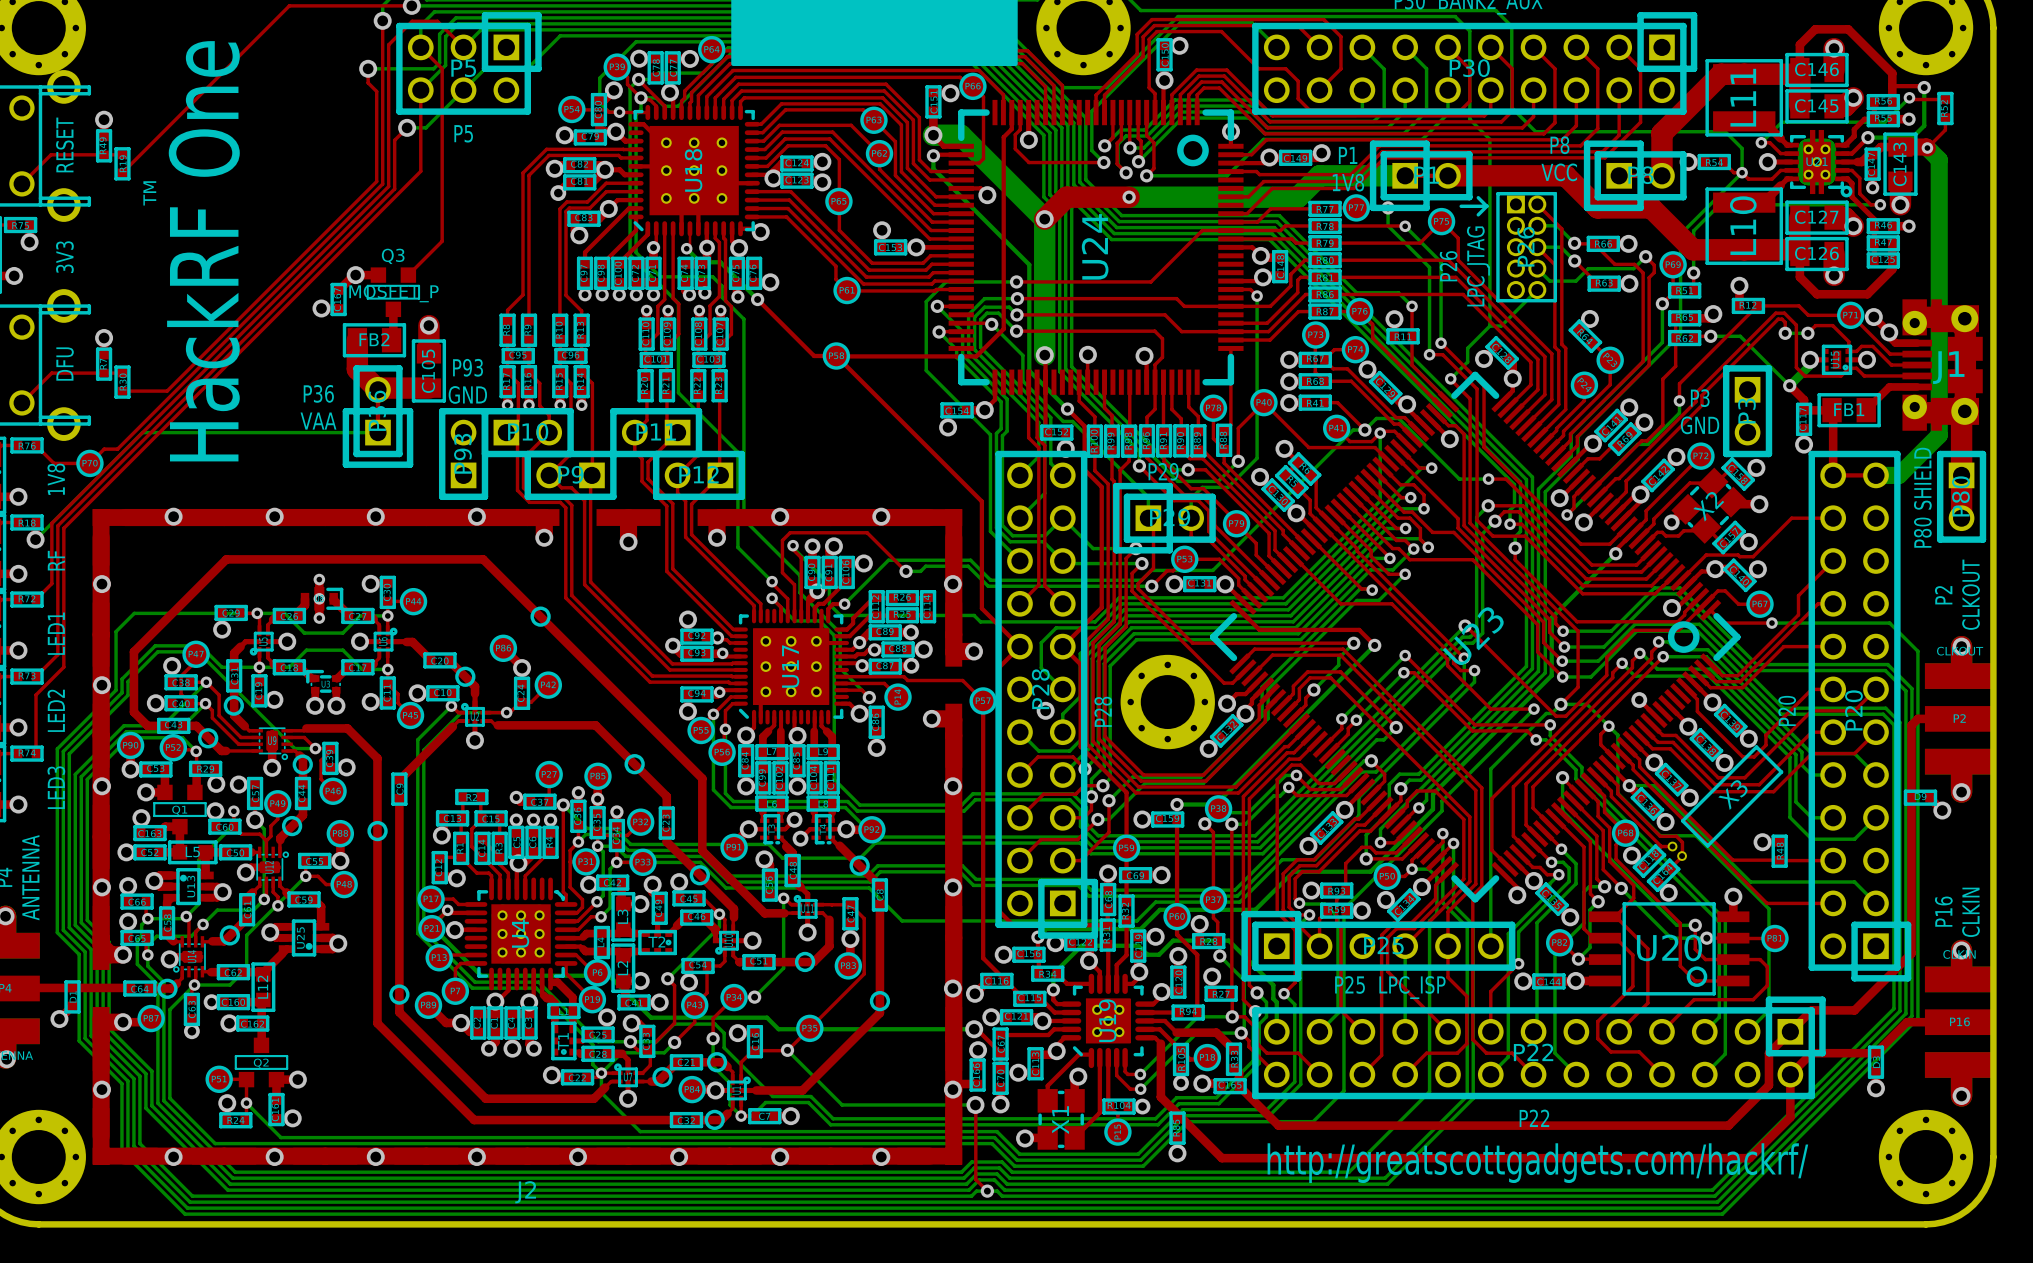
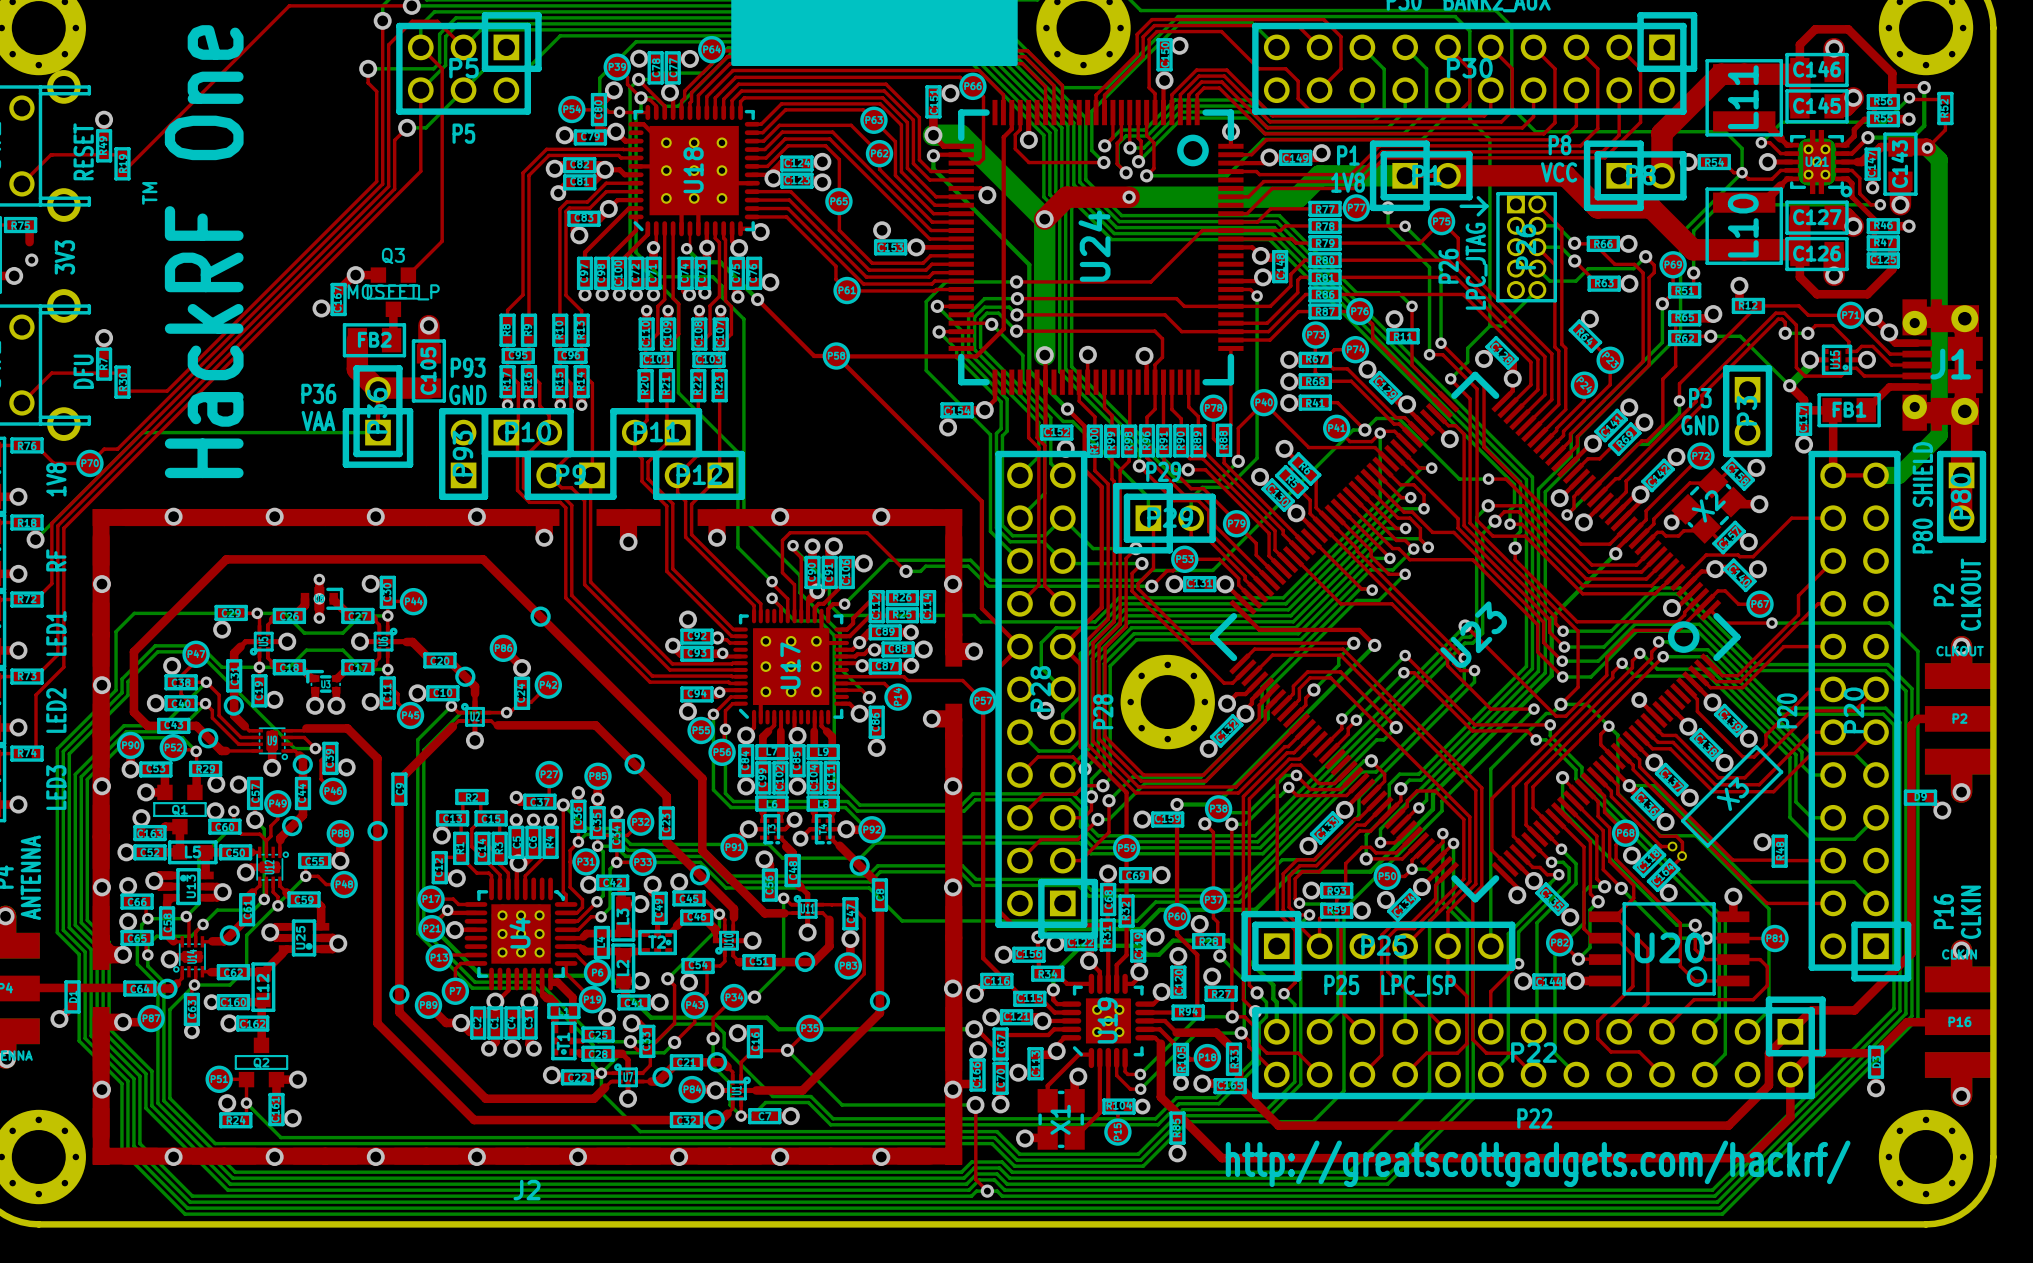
text position: RESET (64, 144) -> RESET (83, 151)
via: (29, 242) -> none
via: none -> (31, 260)
text position: DFU (65, 364) -> DFU (83, 371)

